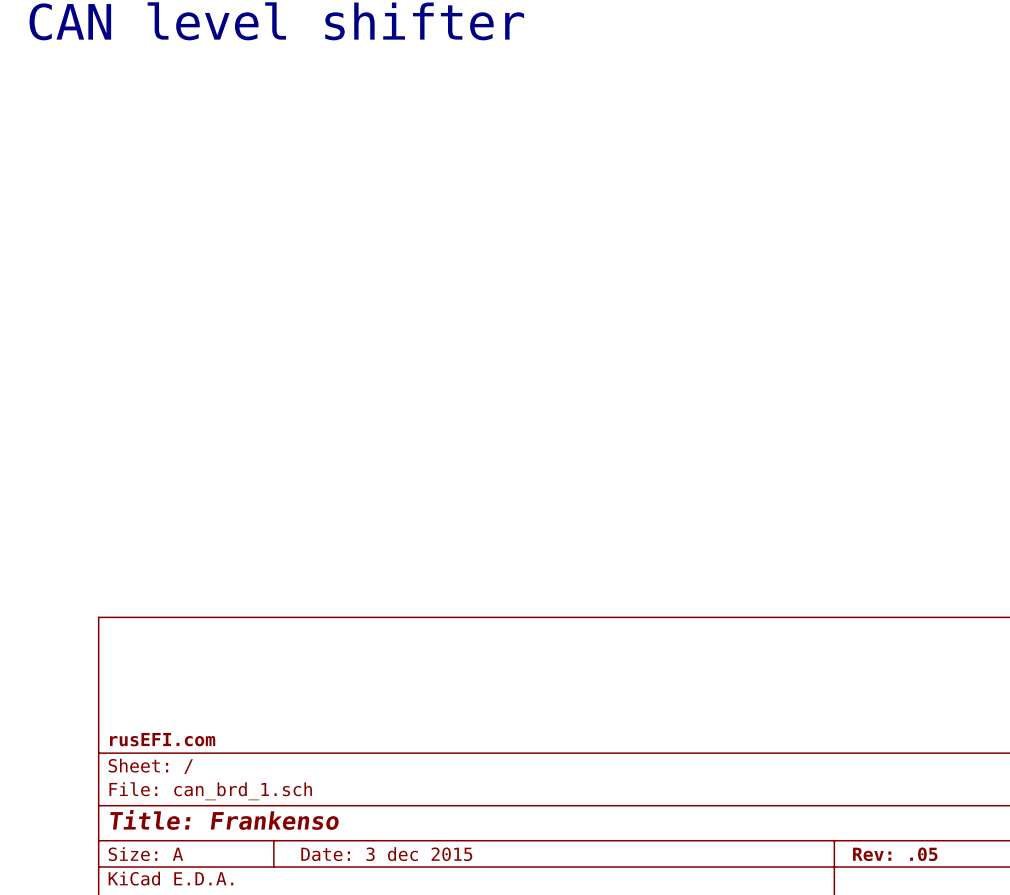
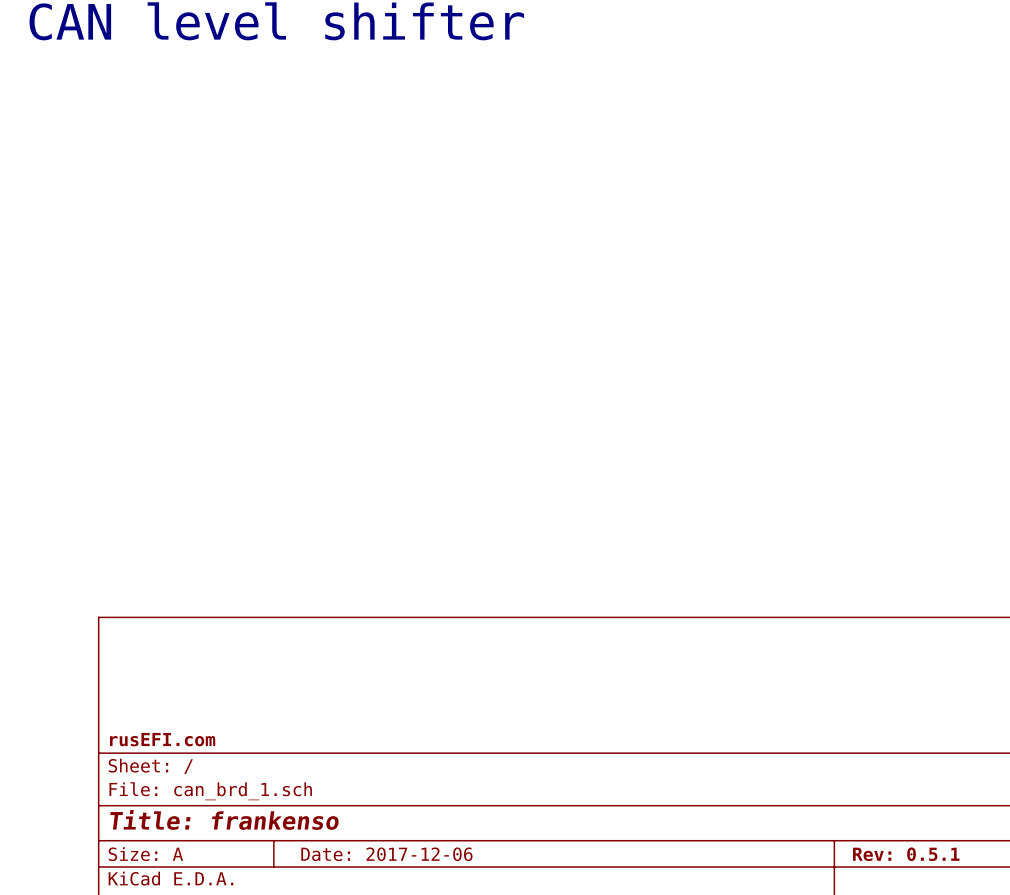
title block: Title: Frankenso (224, 819) -> Title: frankenso (224, 819)
title block: Date: 3 dec 2015 (386, 854) -> Date: 2017-12-06 (386, 854)
title block: Rev: .05 (895, 854) -> Rev: 0.5.1 (906, 854)

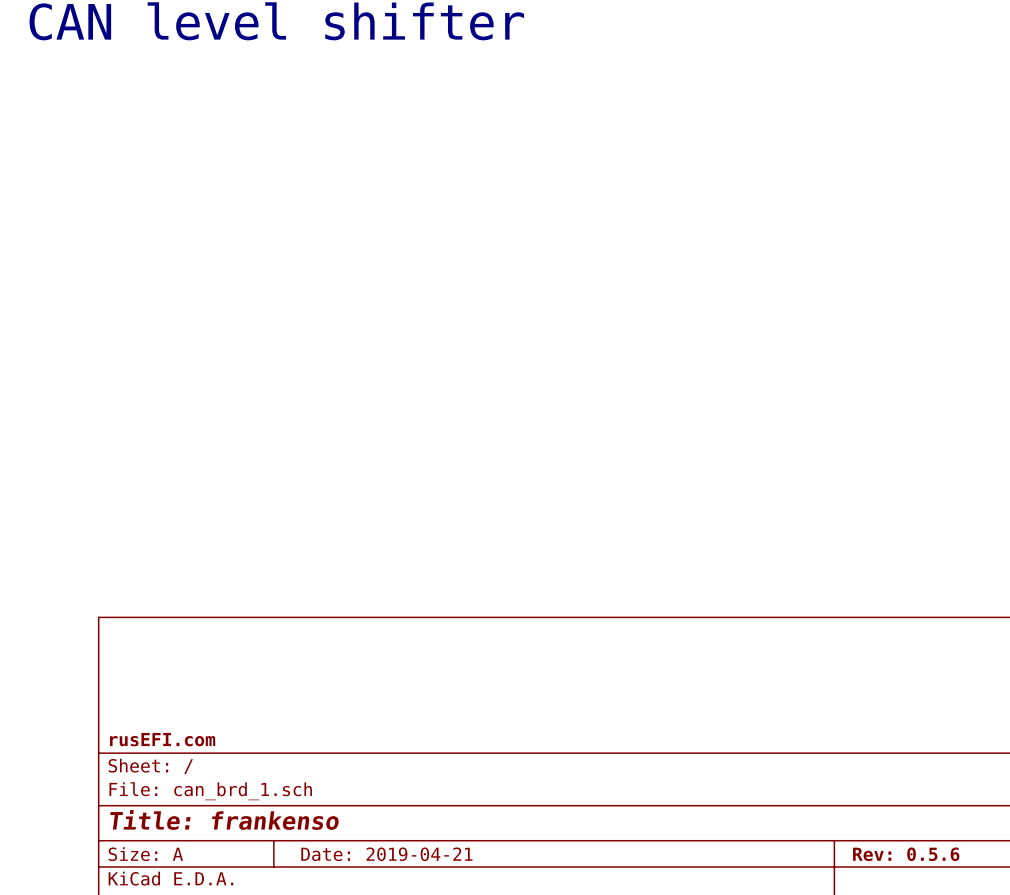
title block: Date: 2017-12-06 (386, 854) -> Date: 2019-04-21 (386, 854)
title block: Rev: 0.5.1 (906, 854) -> Rev: 0.5.6 (906, 854)

